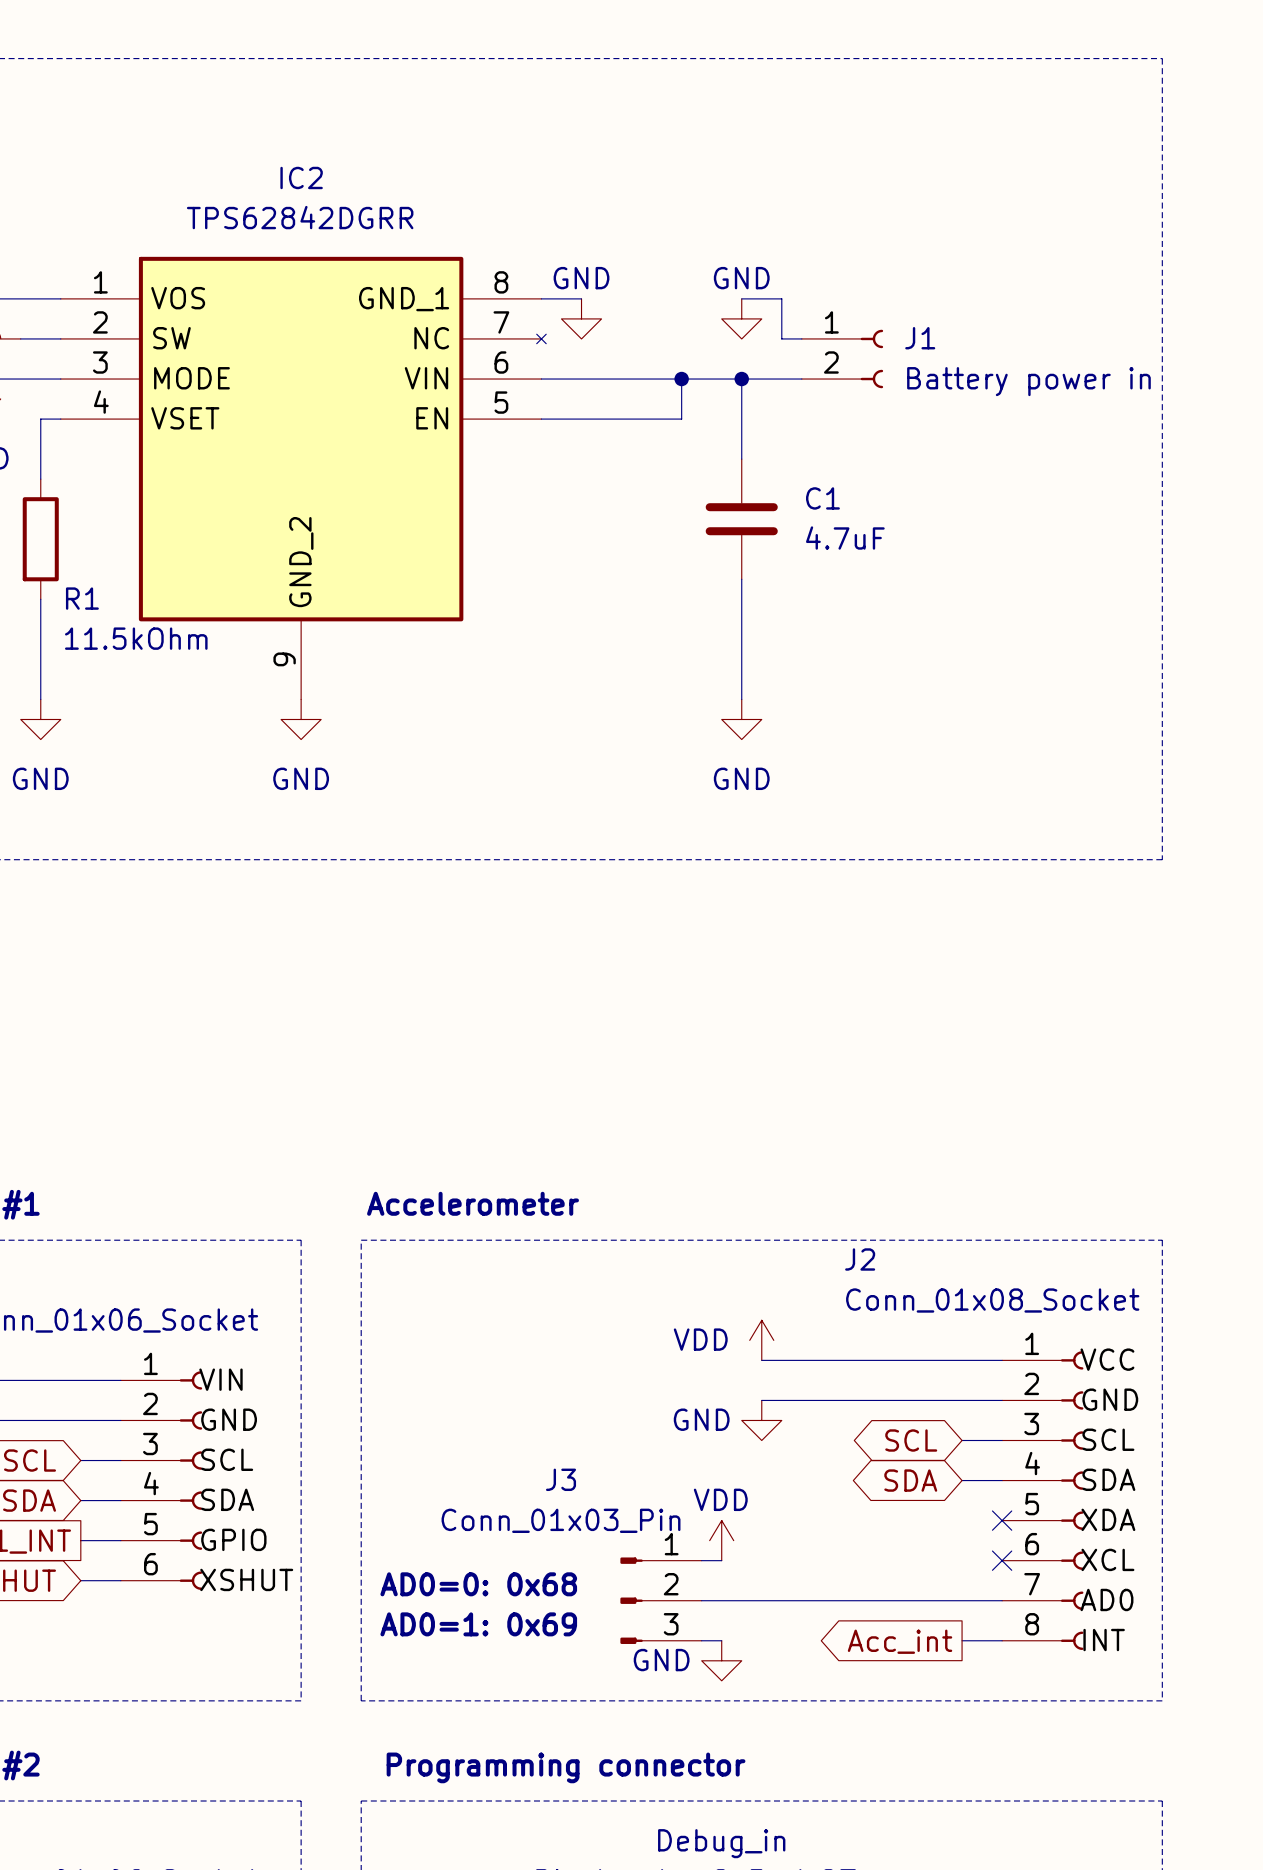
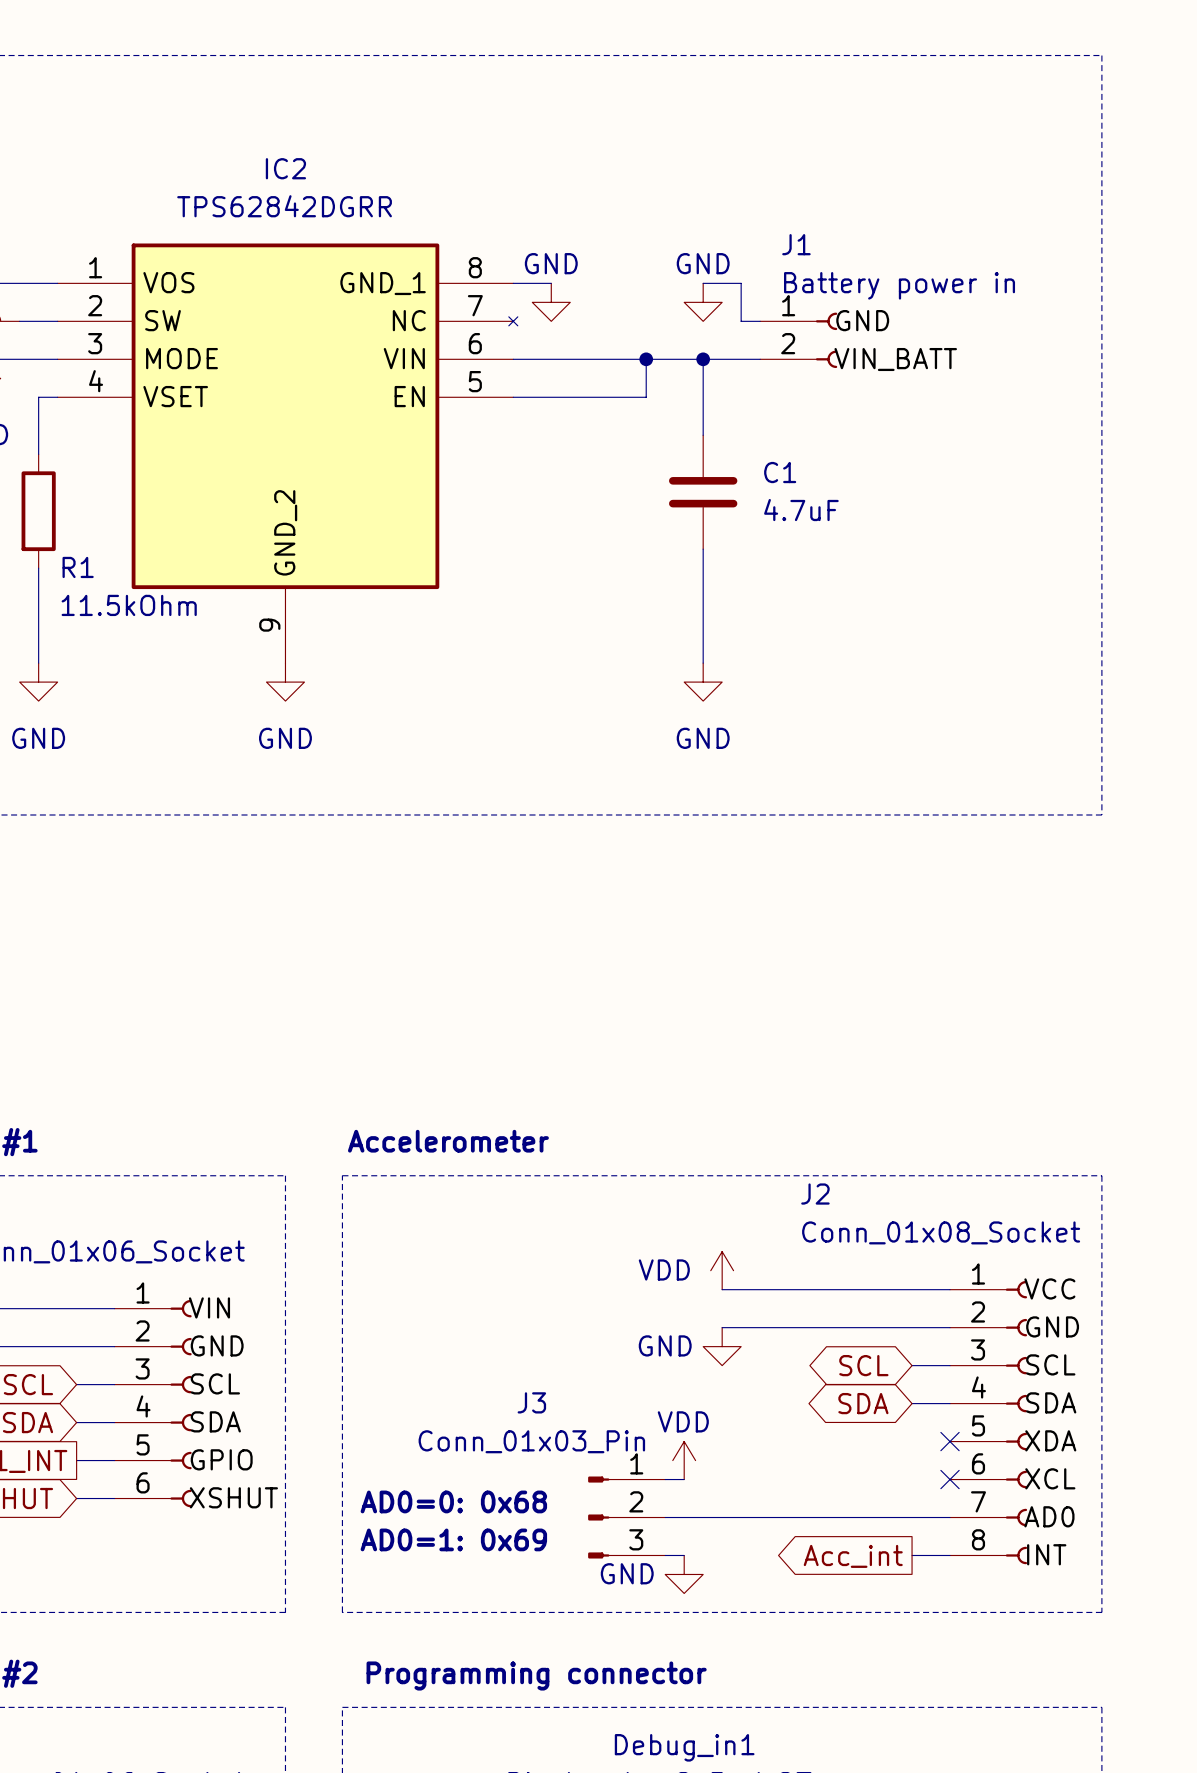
J1 pin name: none -> GND (862, 320)
J1 name position: J1 (920, 338) -> J1 (796, 244)
J1 pin name: none -> VIN_BATT (895, 359)
J1 value position: Battery power in (1028, 381) -> Battery power in (899, 285)
Debug_in name: Debug_in (721, 1843) -> Debug_in1 (684, 1747)

